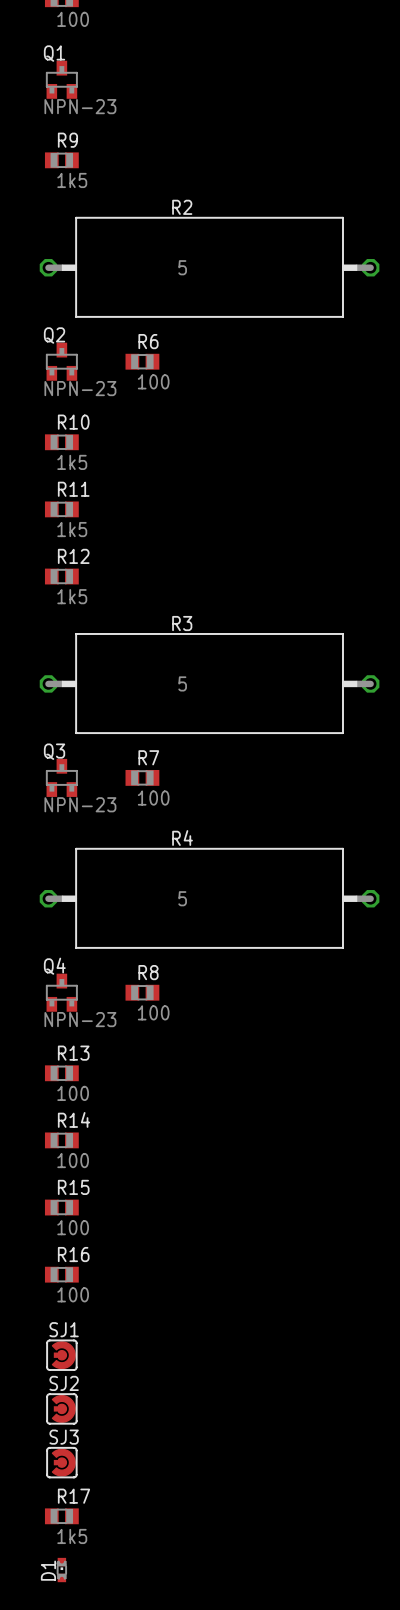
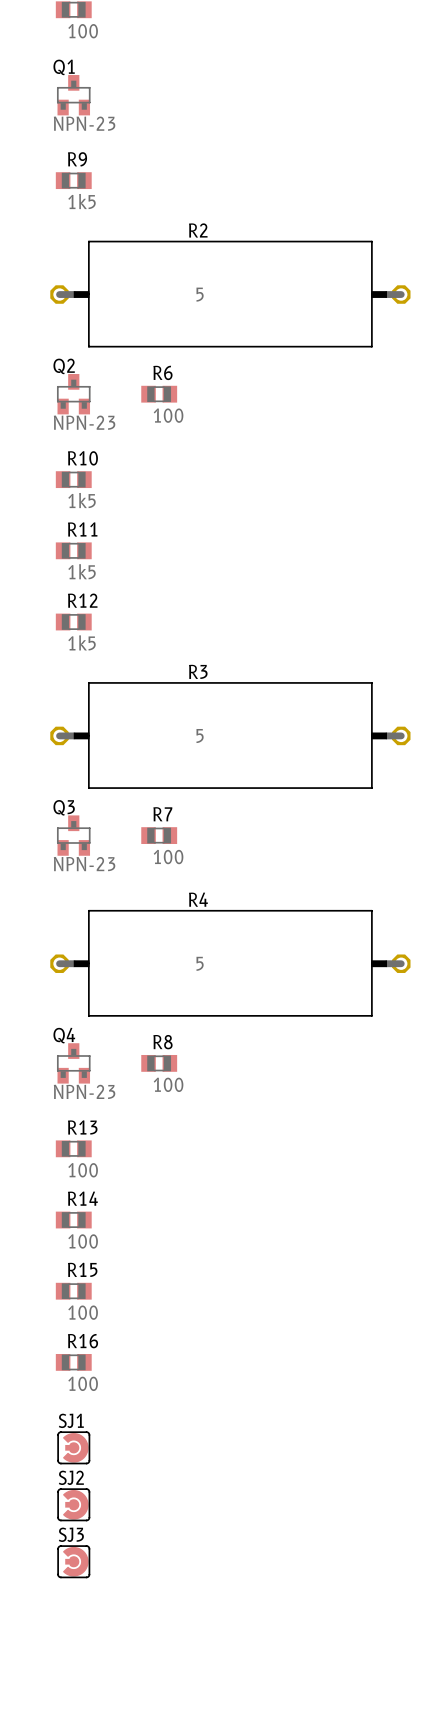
R17: 1k5 (61, 1516) -> none
D1: (61, 1570) -> none

